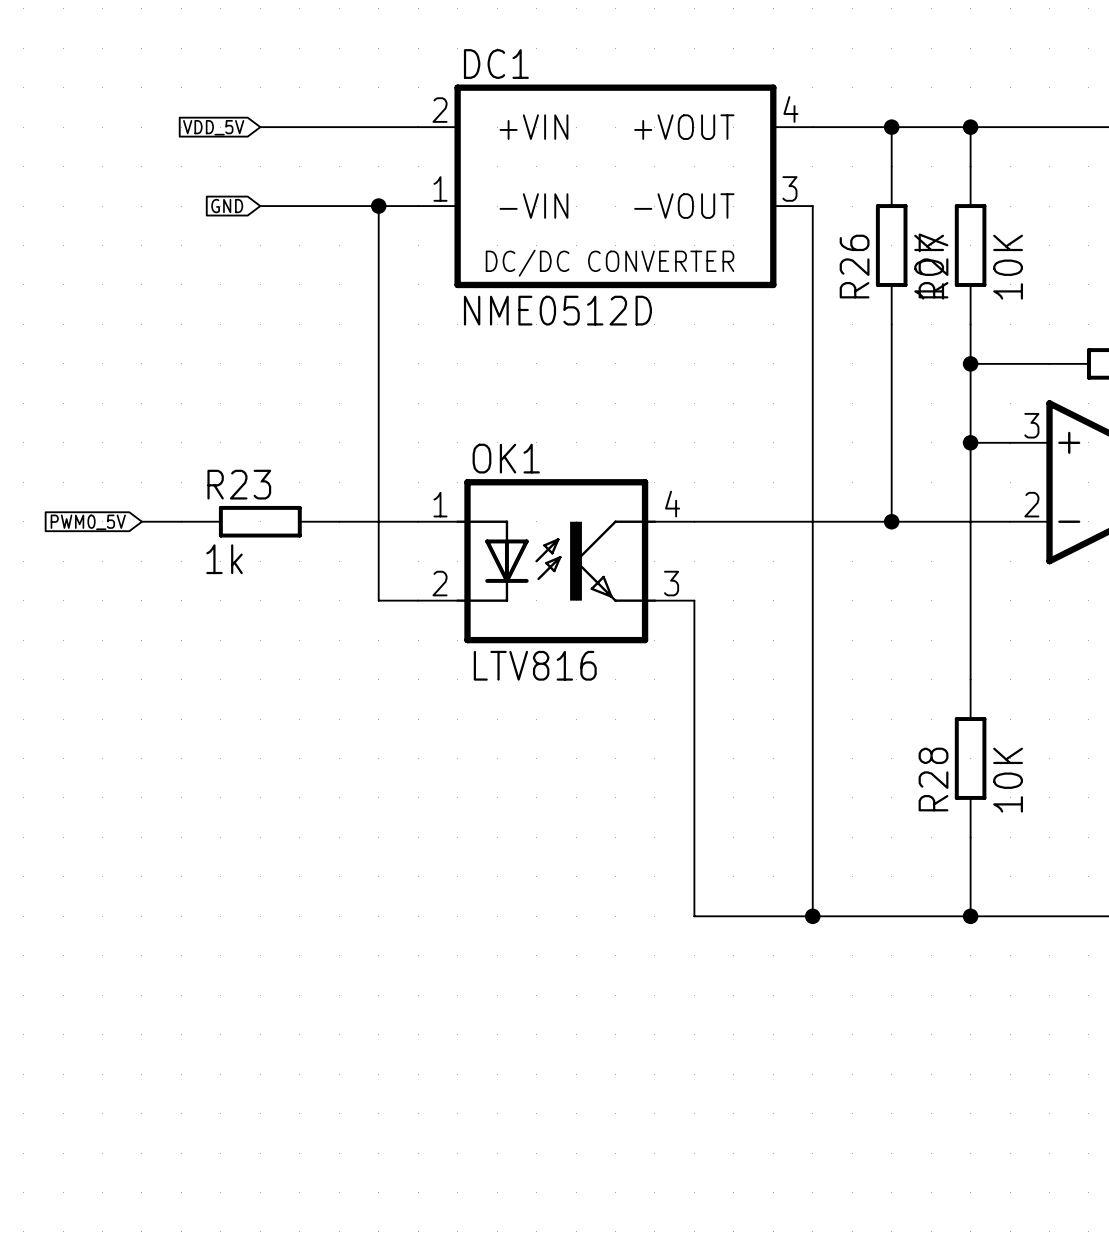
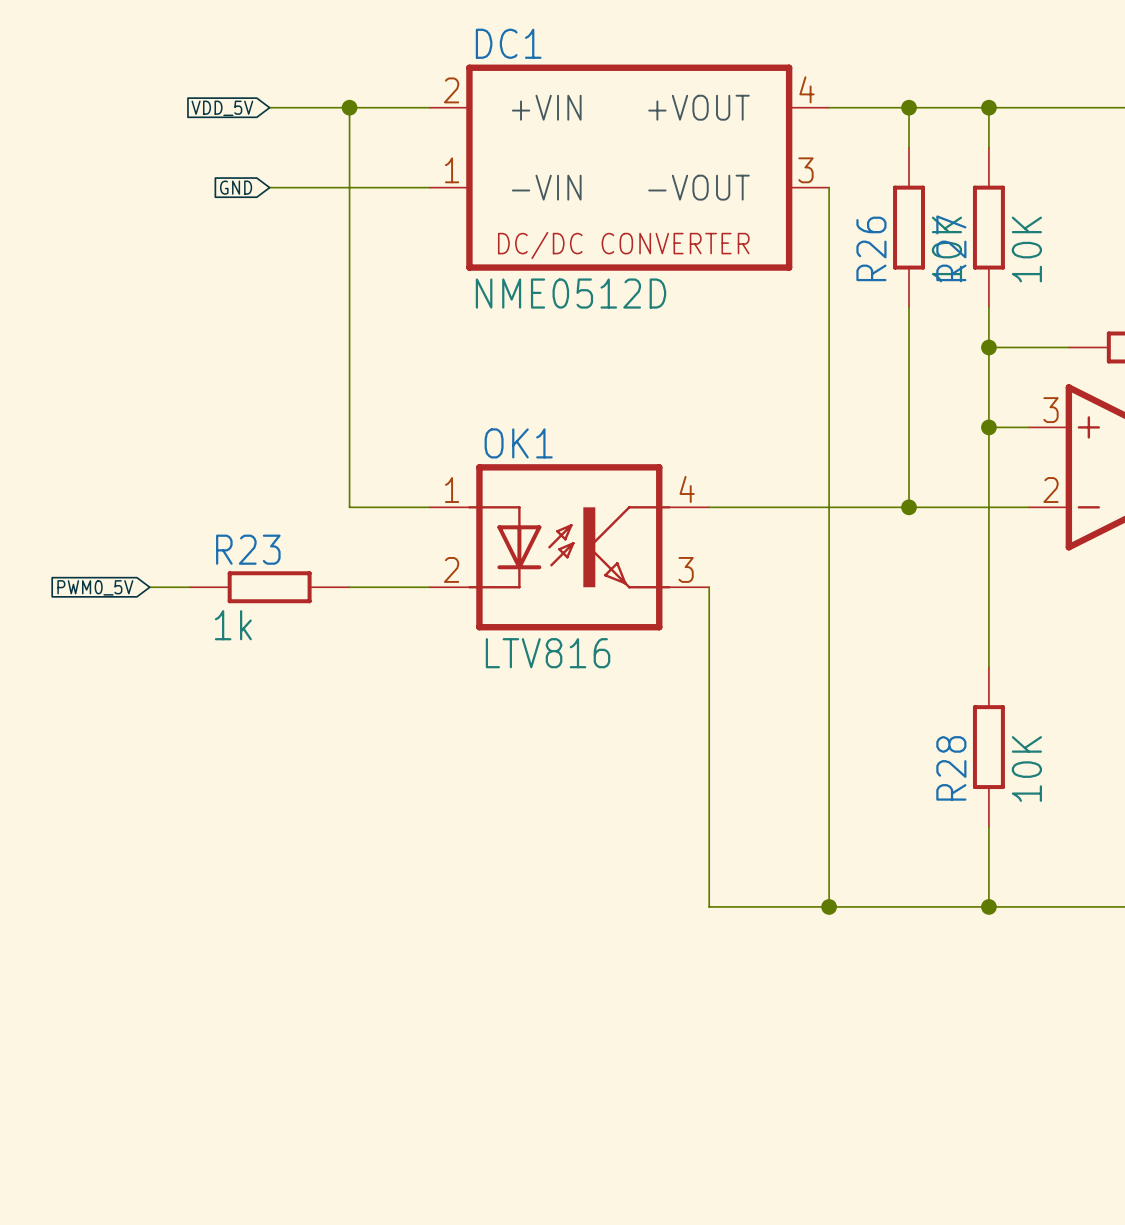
wire: none -> (349, 107) (349, 507)
wire: (378, 206) (378, 600) -> (349, 587) (389, 587)
junction position: (378, 206) -> (349, 107)
wire: (141, 521) (181, 521) -> (149, 587) (189, 587)
R23 position: (260, 521) -> (269, 587)
global label position: PWM0_5V (88, 522) -> PWM0_5V (95, 587)

